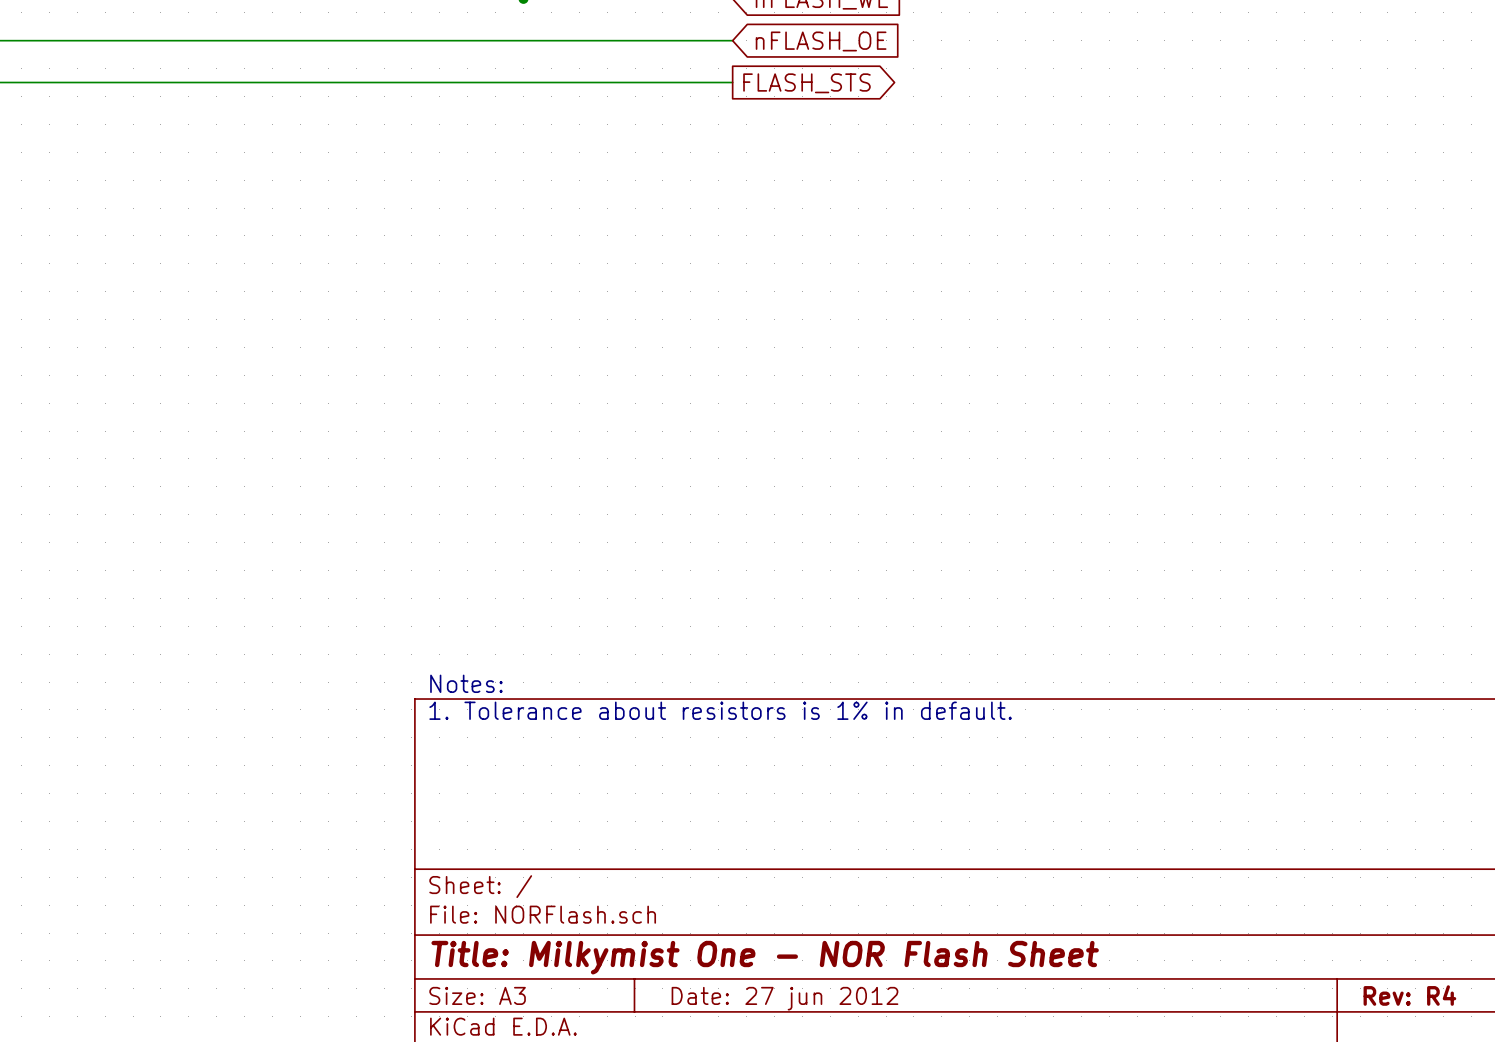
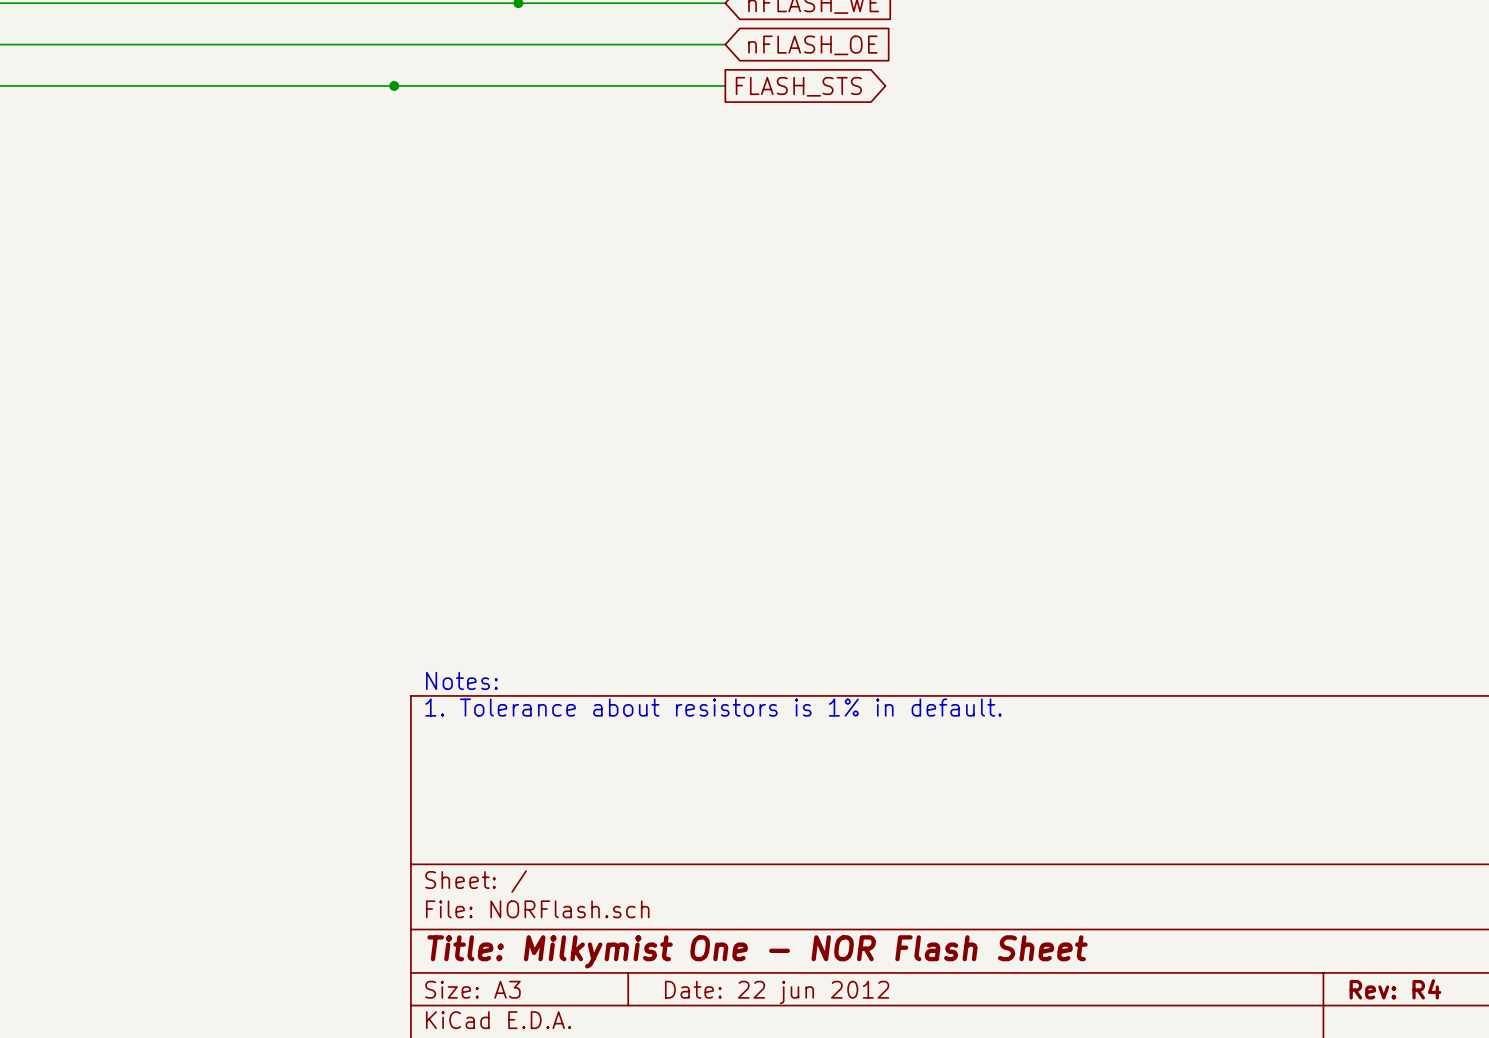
junction: none -> (394, 85)
title block: Date: 27 jun 2012 (784, 998) -> Date: 22 jun 2012 (777, 992)

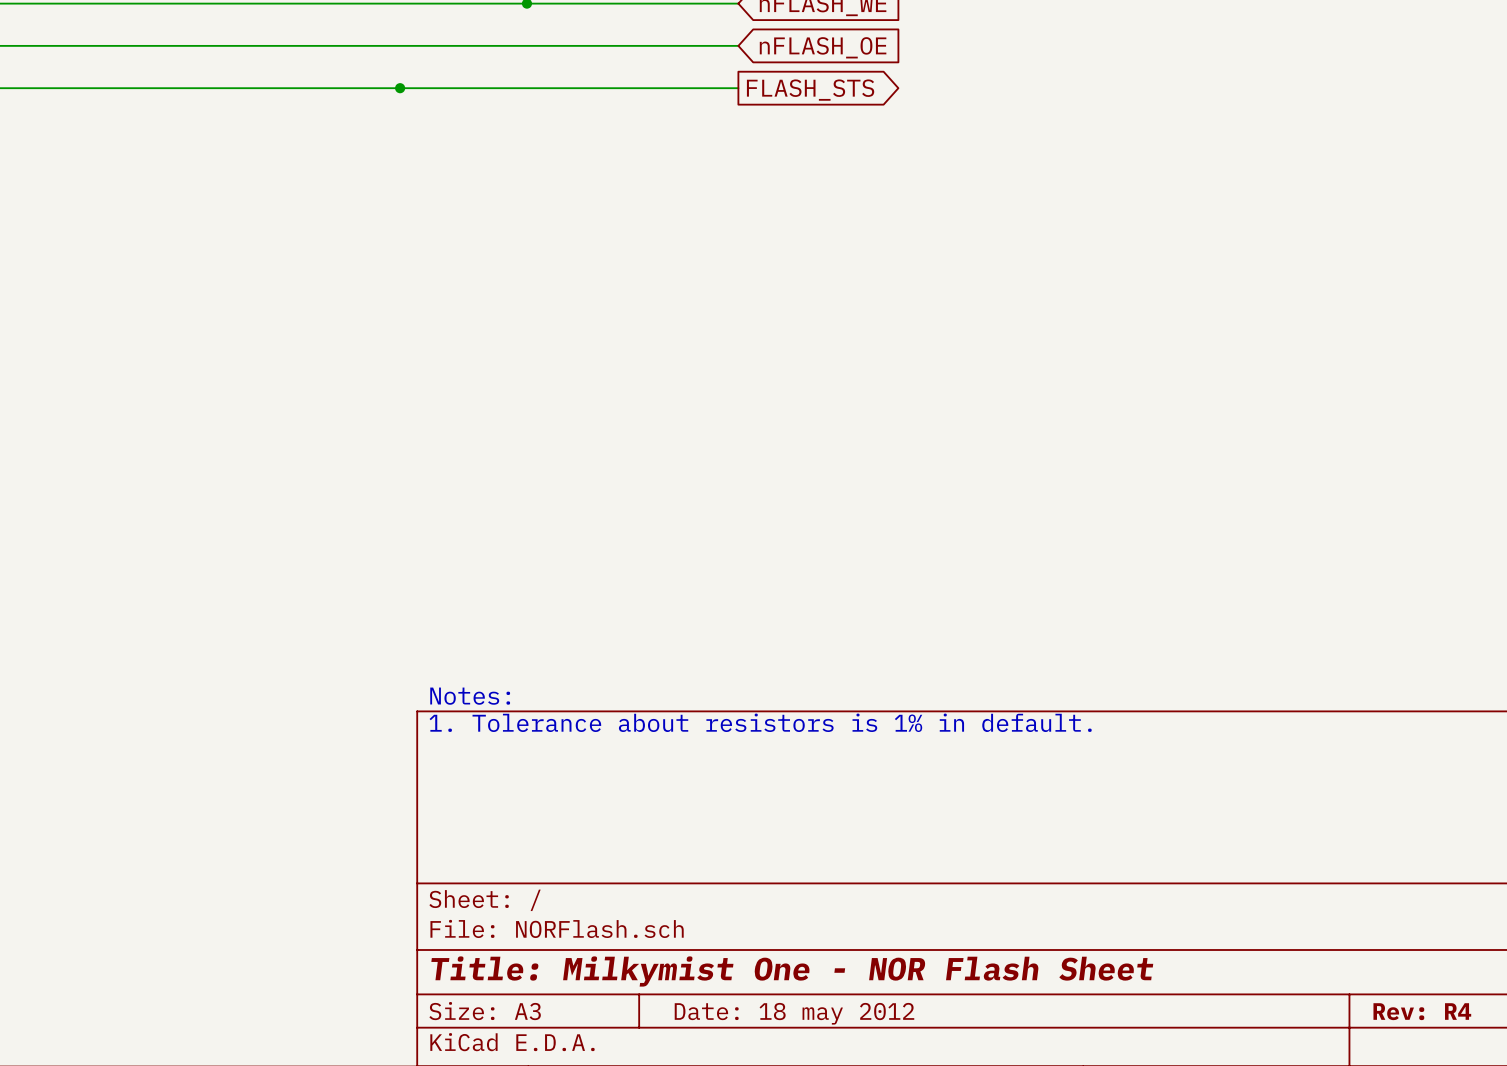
title block: Date: 22 jun 2012 (777, 992) -> Date: 18 may 2012 (794, 1013)

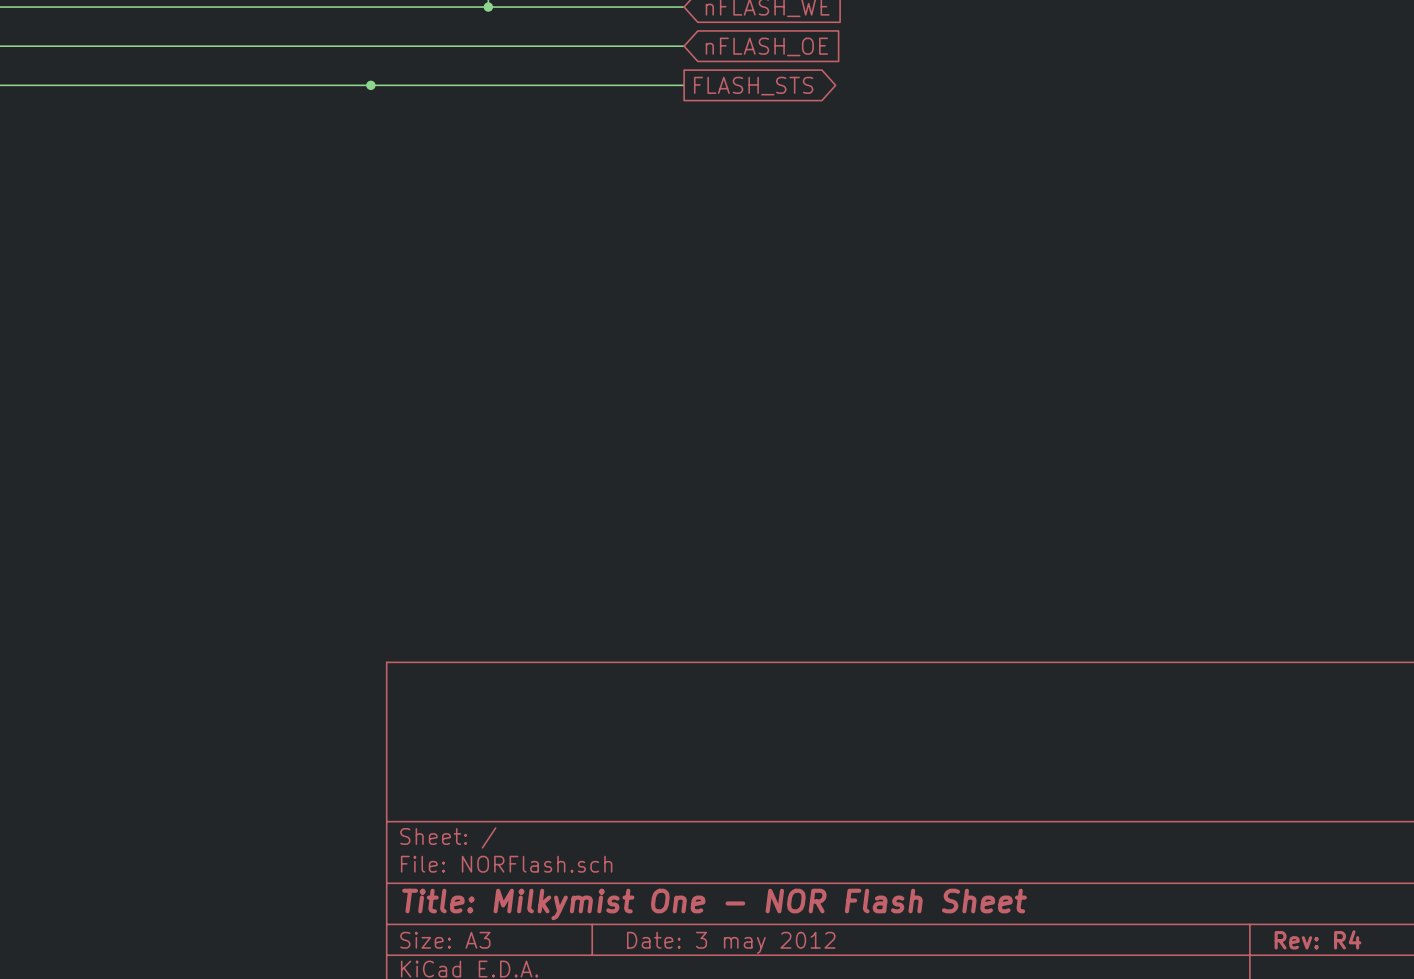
text: Notes: (470, 696) -> none
text: 1. Tolerance about resistors is 1% in default. (760, 722) -> none
title block: Date: 18 may 2012 (794, 1013) -> Date: 3 may 2012 (731, 942)

